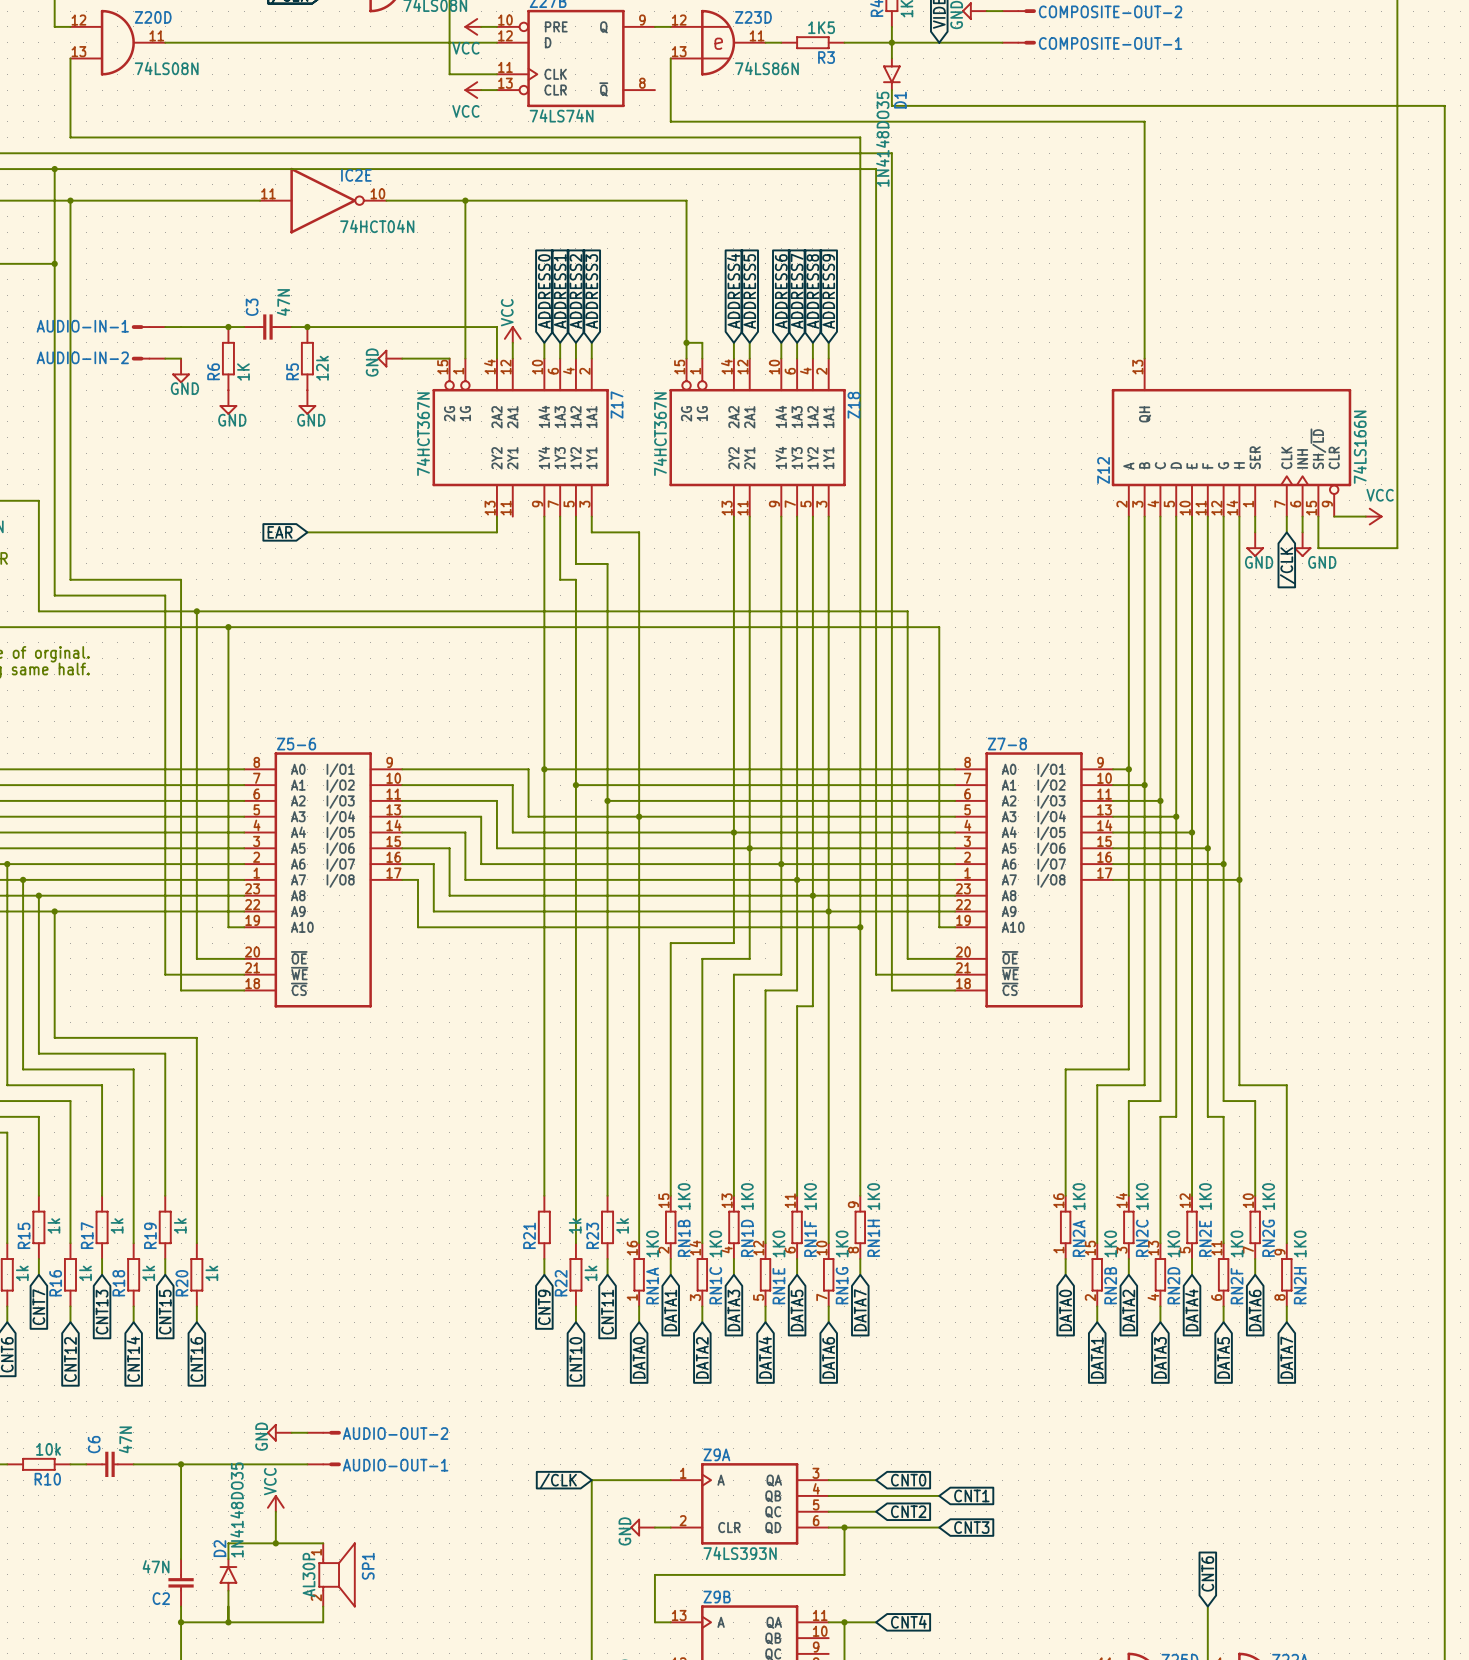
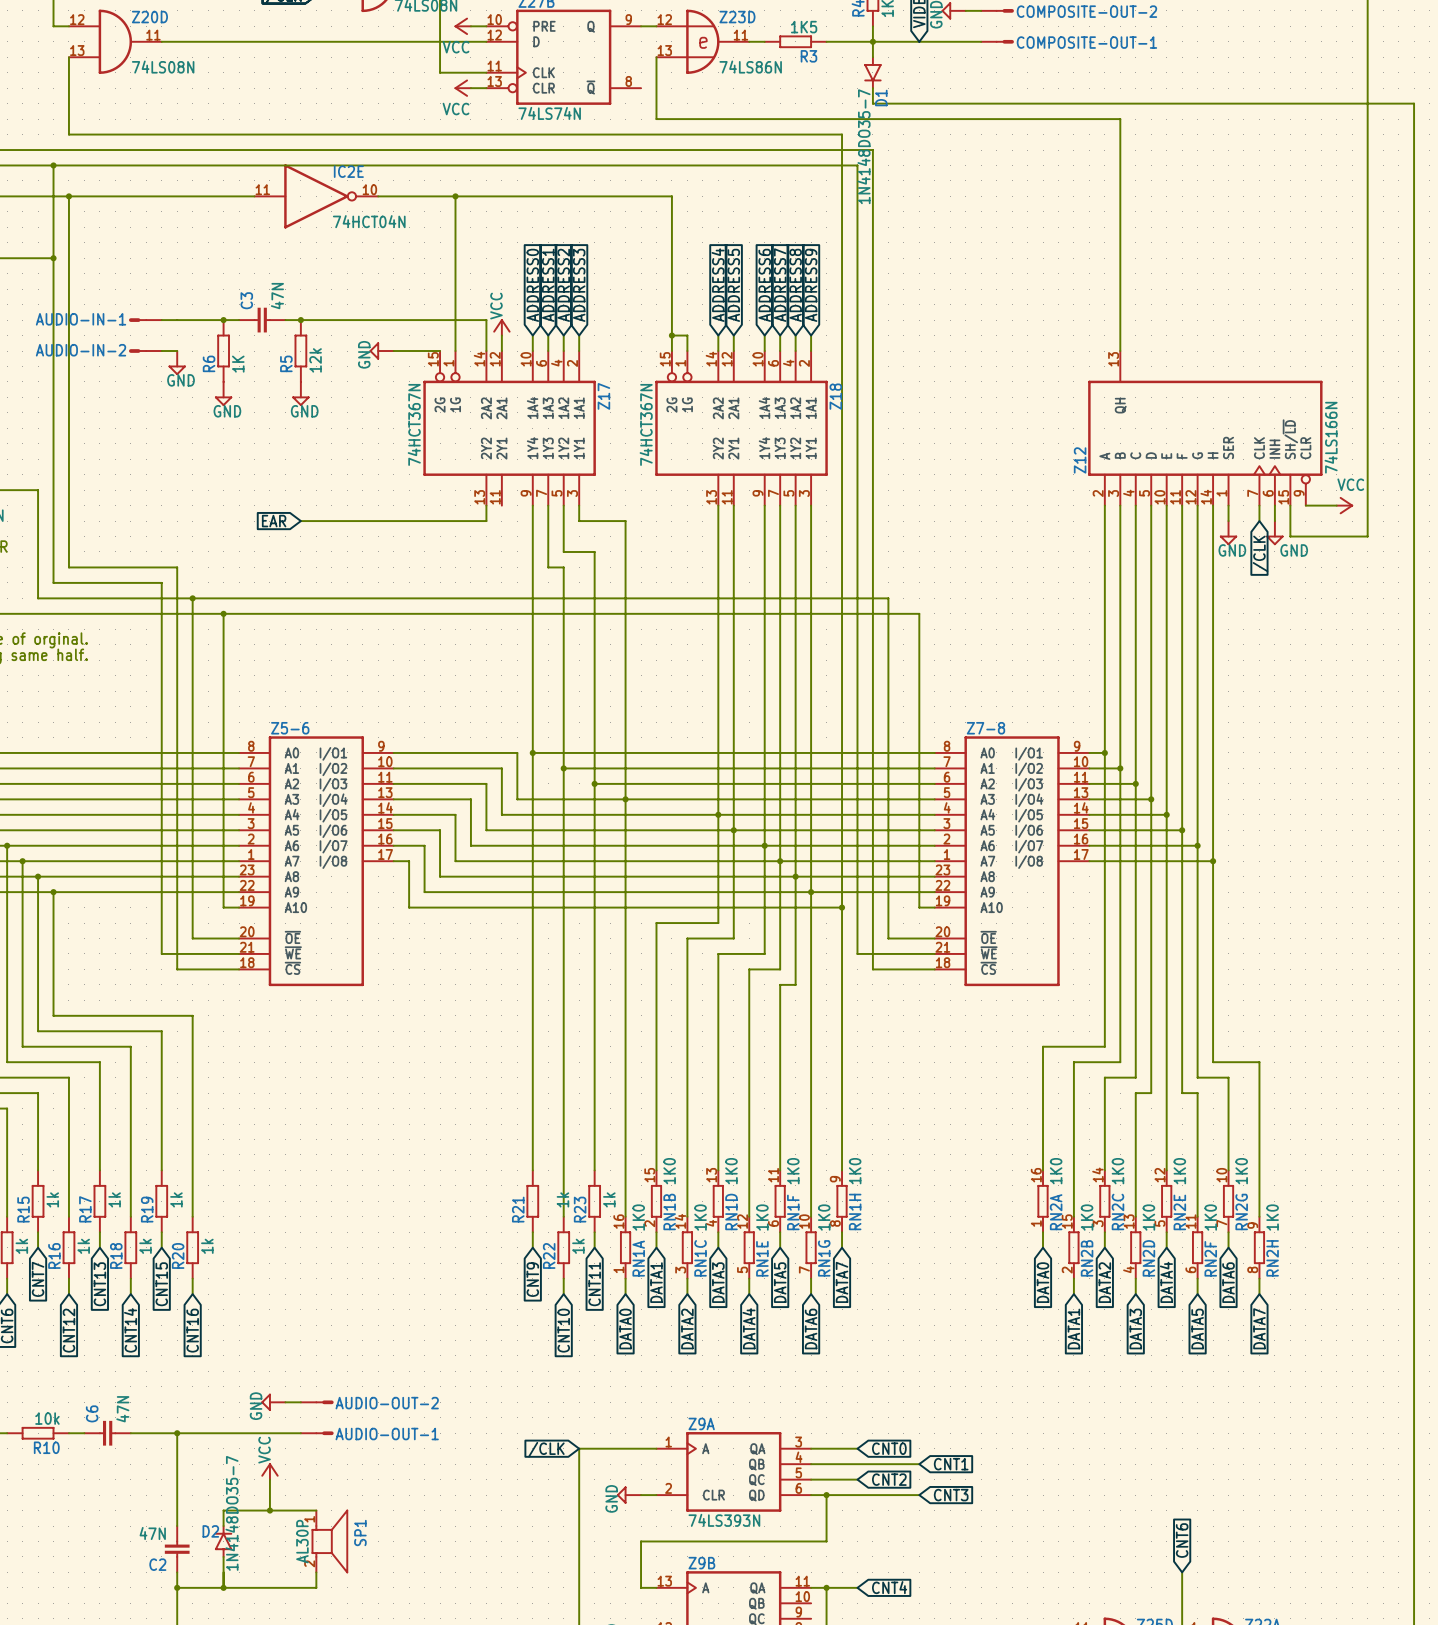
D1 value: 1N4148DO35 (882, 139) -> 1N4148DO35-7 (864, 146)
D2 value: 1N4148DO35 (237, 1509) -> 1N4148DO35-7 (231, 1513)
D2 name rotation: 0° (219, 1548) -> 90° clockwise (210, 1531)

